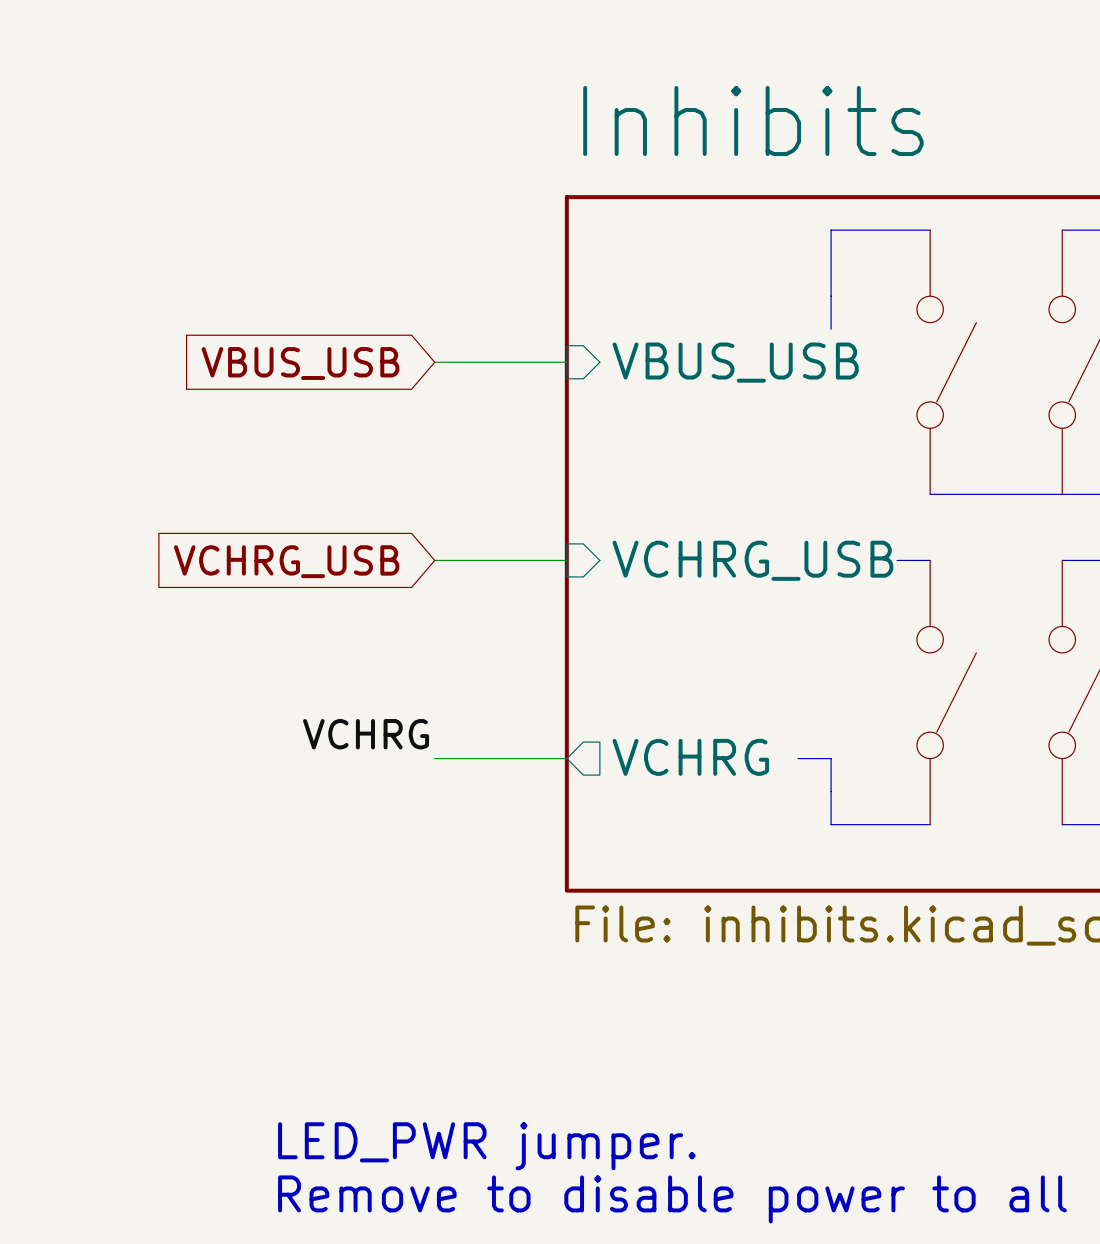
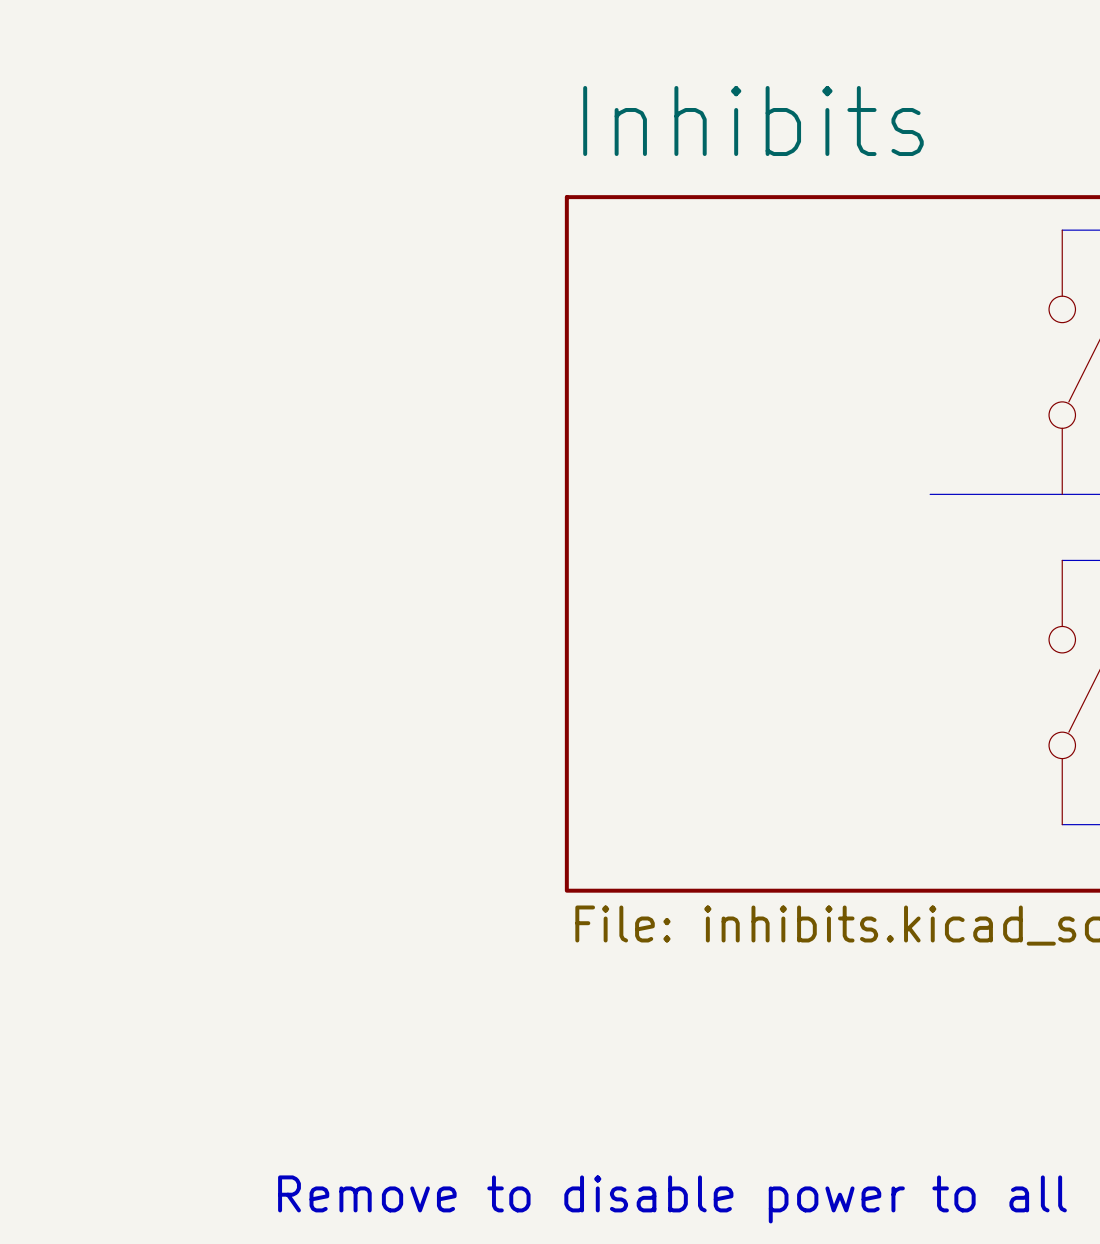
line: (930, 230) (831, 230) (831, 329) -> none
wire: (434, 362) (566, 362) -> none
sheet pin: VBUS_USB (735, 362) -> none
part: (946, 362) -> none
global label: VBUS_USB (300, 363) -> none
wire: (434, 560) (566, 560) -> none
sheet pin: VCHRG_USB (752, 560) -> none
line: (897, 560) (930, 560) -> none
global label: VCHRG_USB (286, 561) -> none
part: (946, 692) -> none
label: VCHRG (366, 734) -> none
sheet pin: VCHRG (690, 757) -> none
wire: (434, 758) (566, 758) -> none
line: (798, 758) (831, 758) (831, 824) (930, 824) -> none
text: LED_PWR jumper. (486, 1146) -> none

